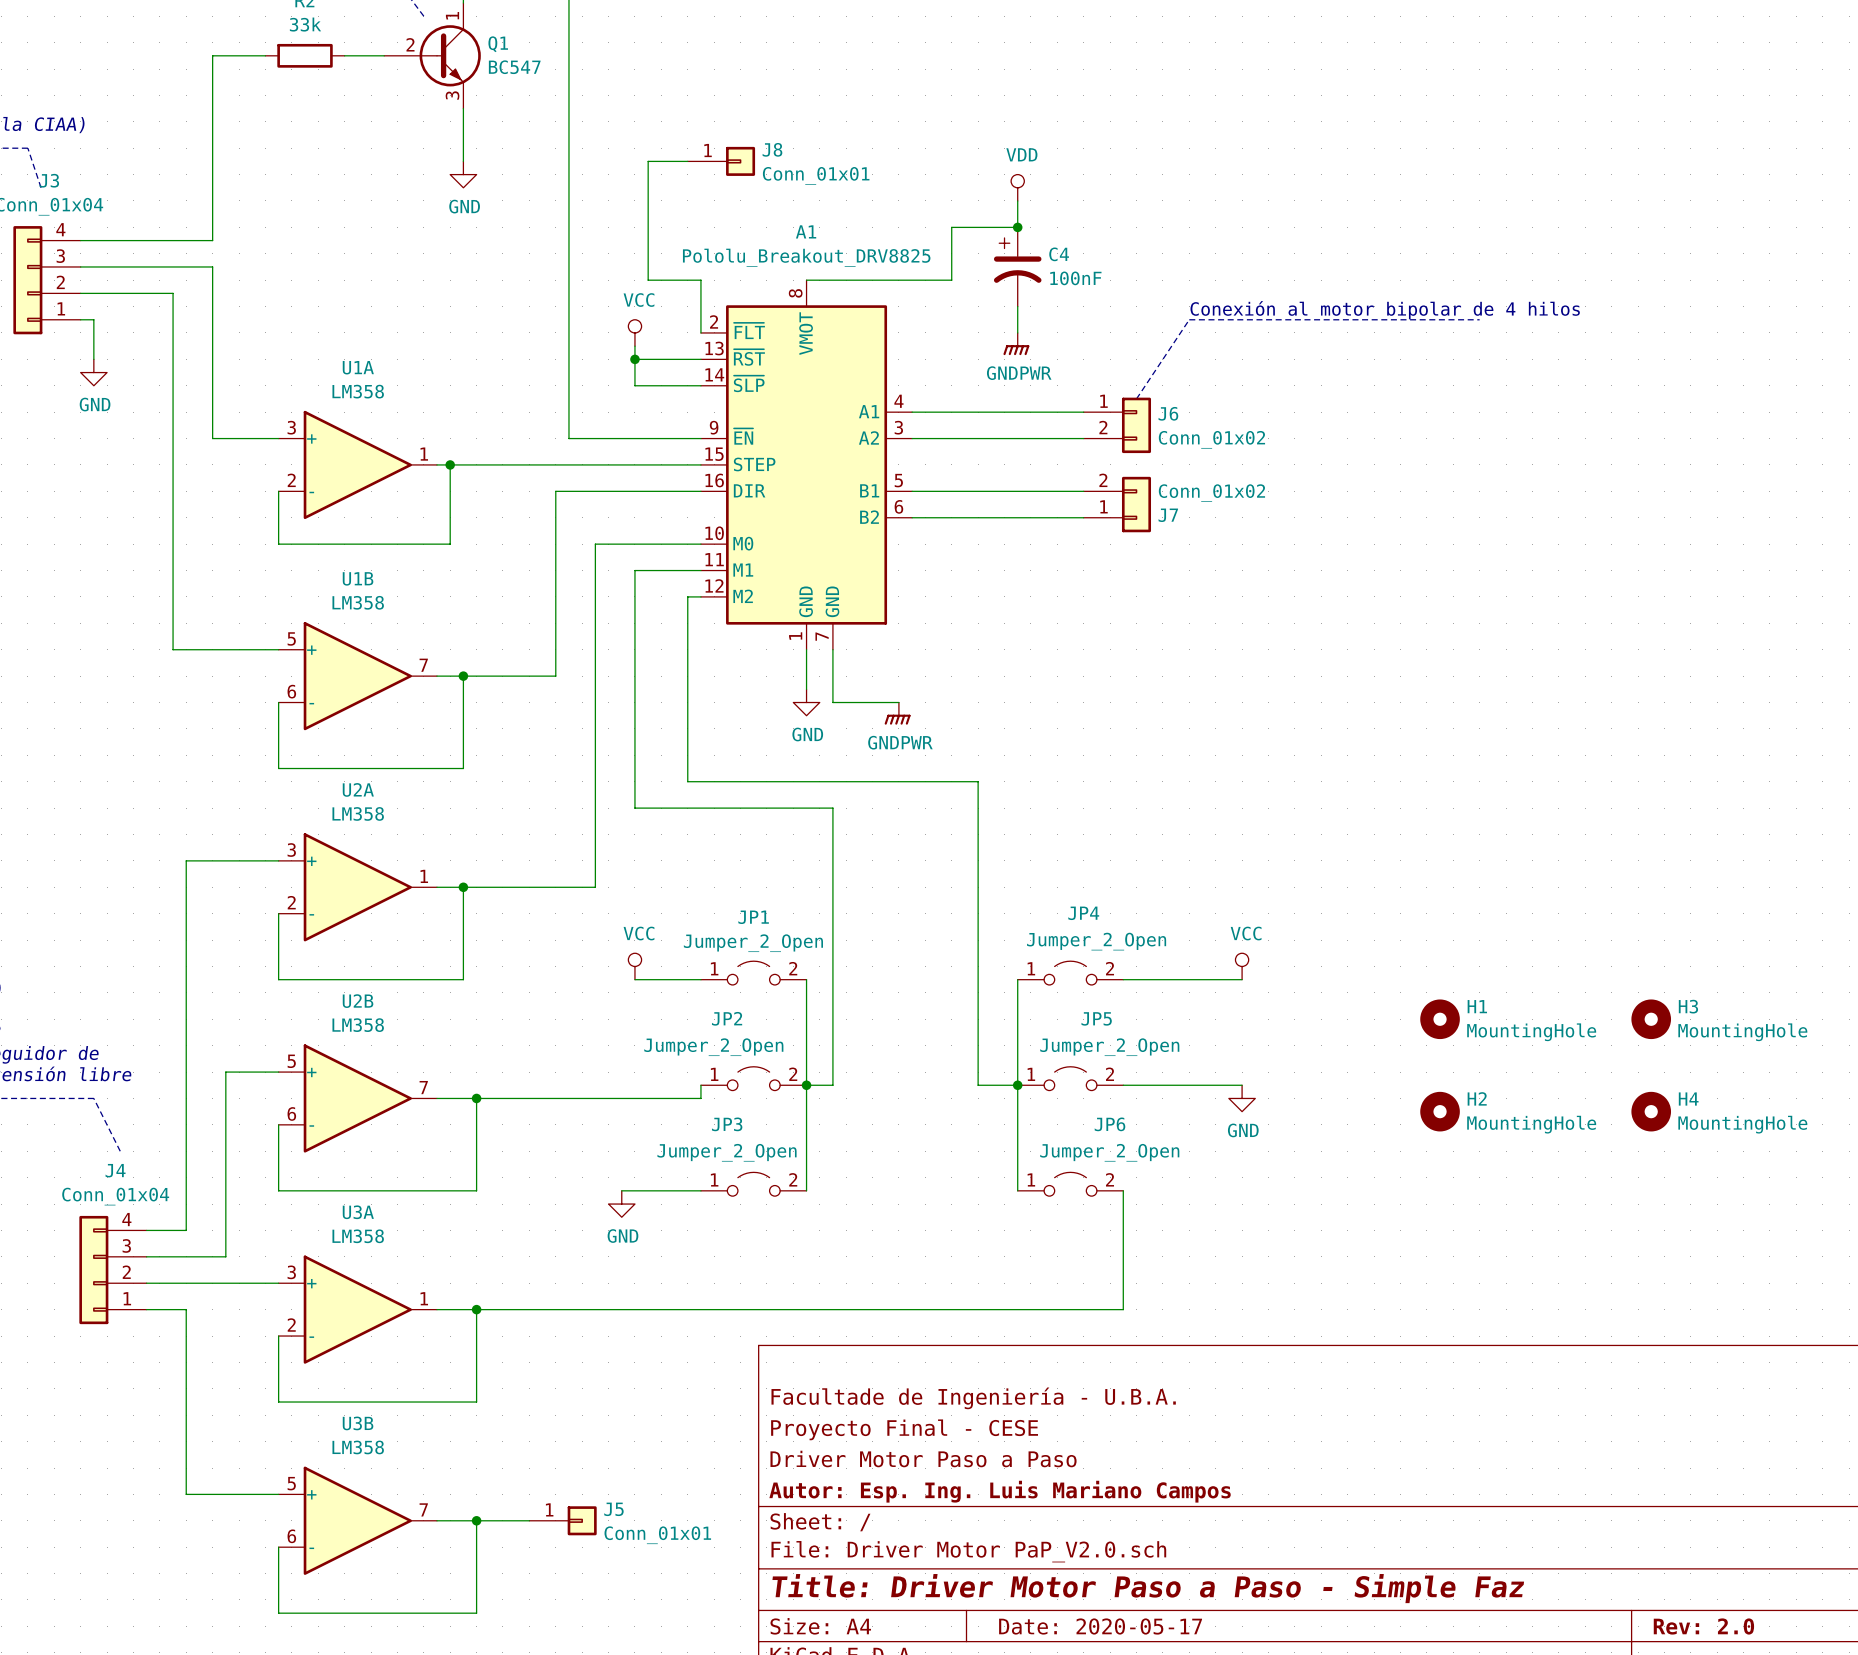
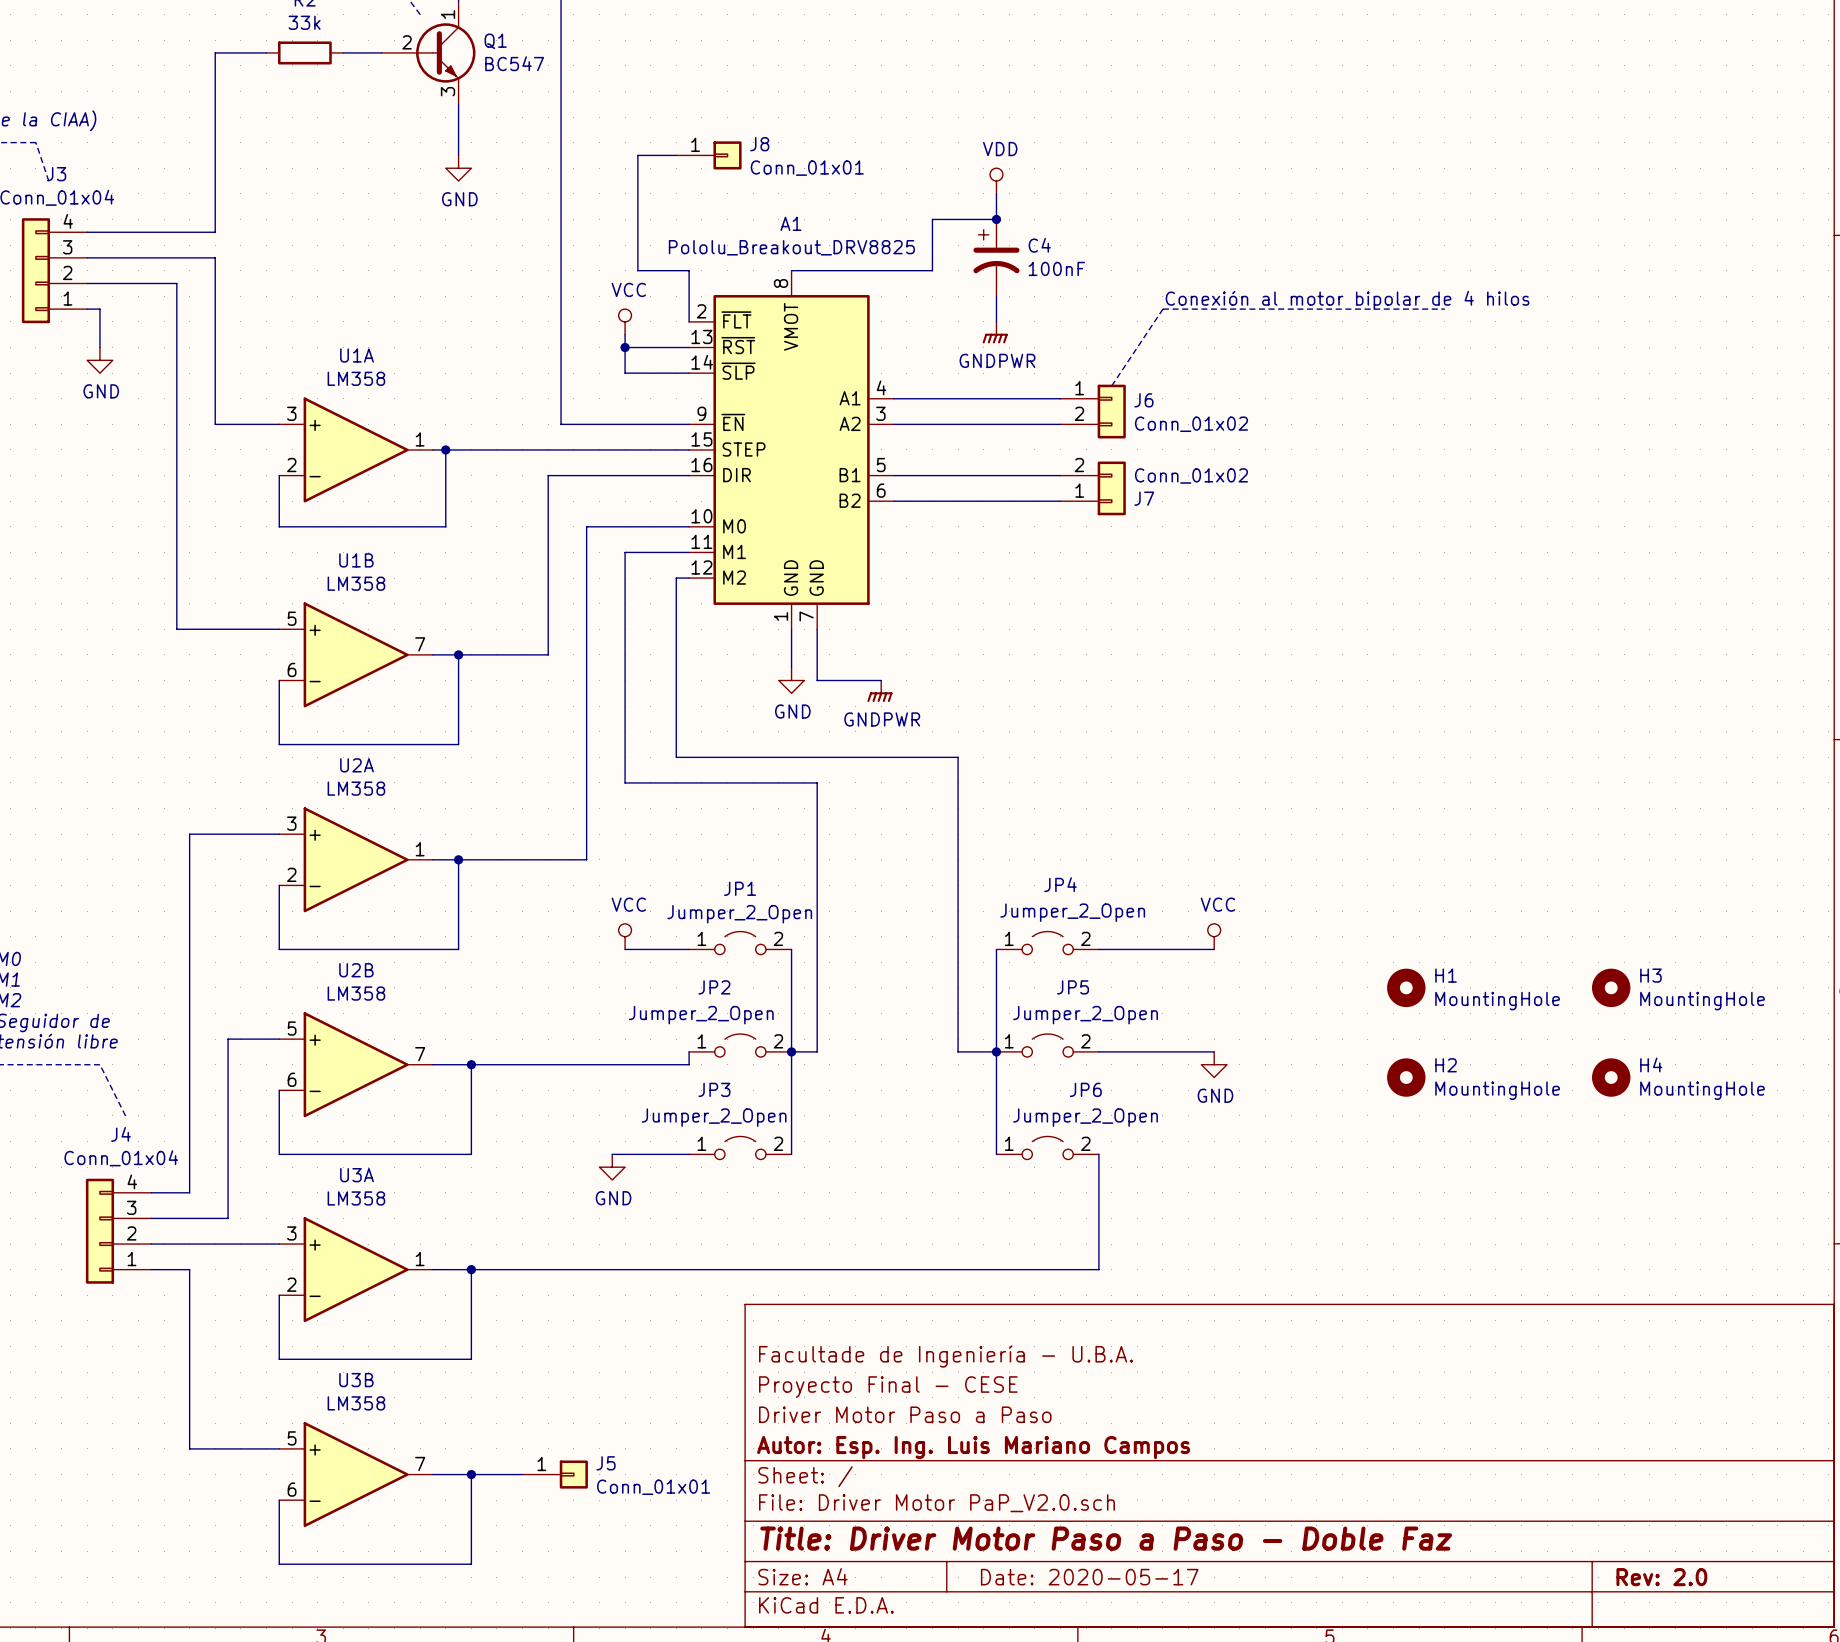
title block: Title: Driver Motor Paso a Paso - Simple Faz (1148, 1588) -> Title: Driver Motor Paso a Paso - Doble Faz (1106, 1538)

